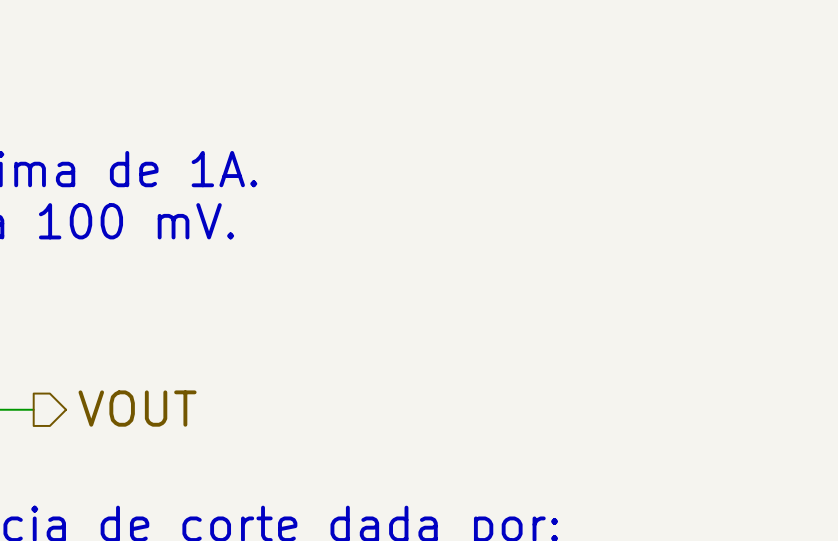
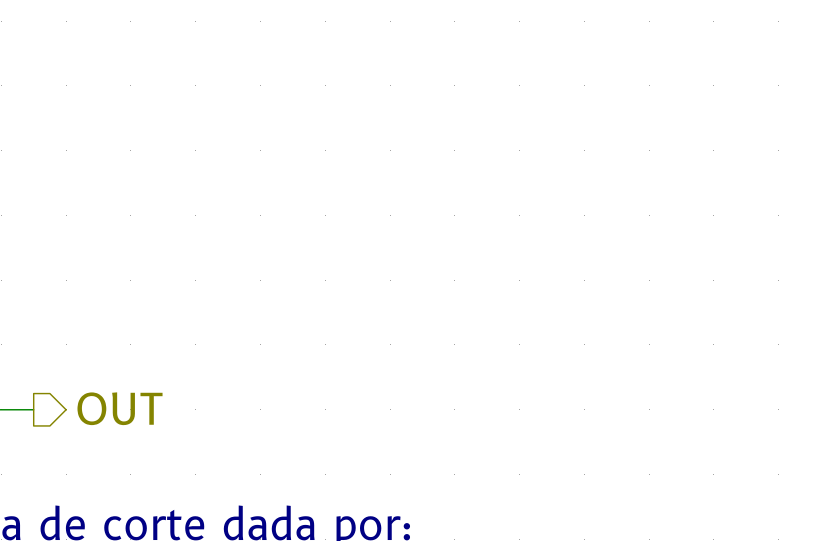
hierarchical label: VOUT (137, 408) -> OUT (120, 408)

